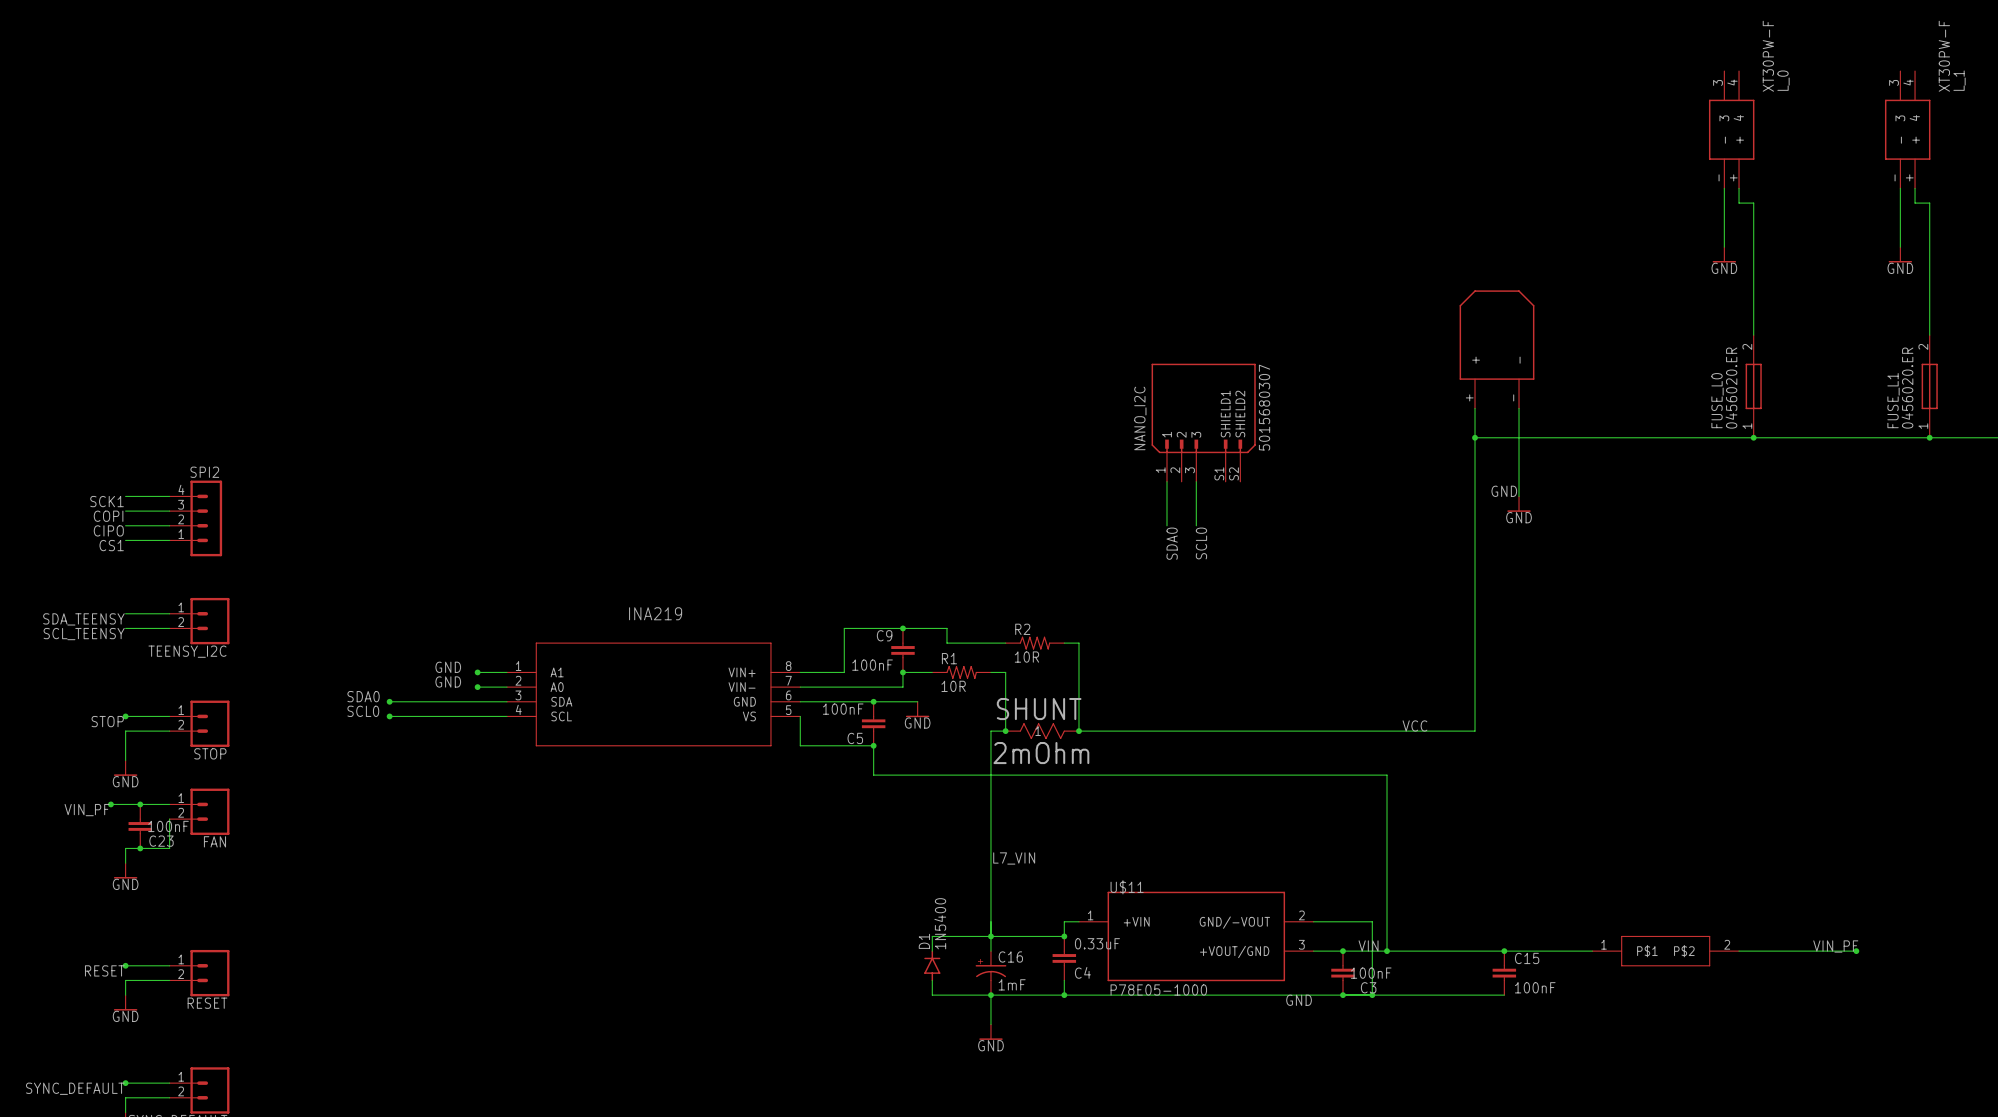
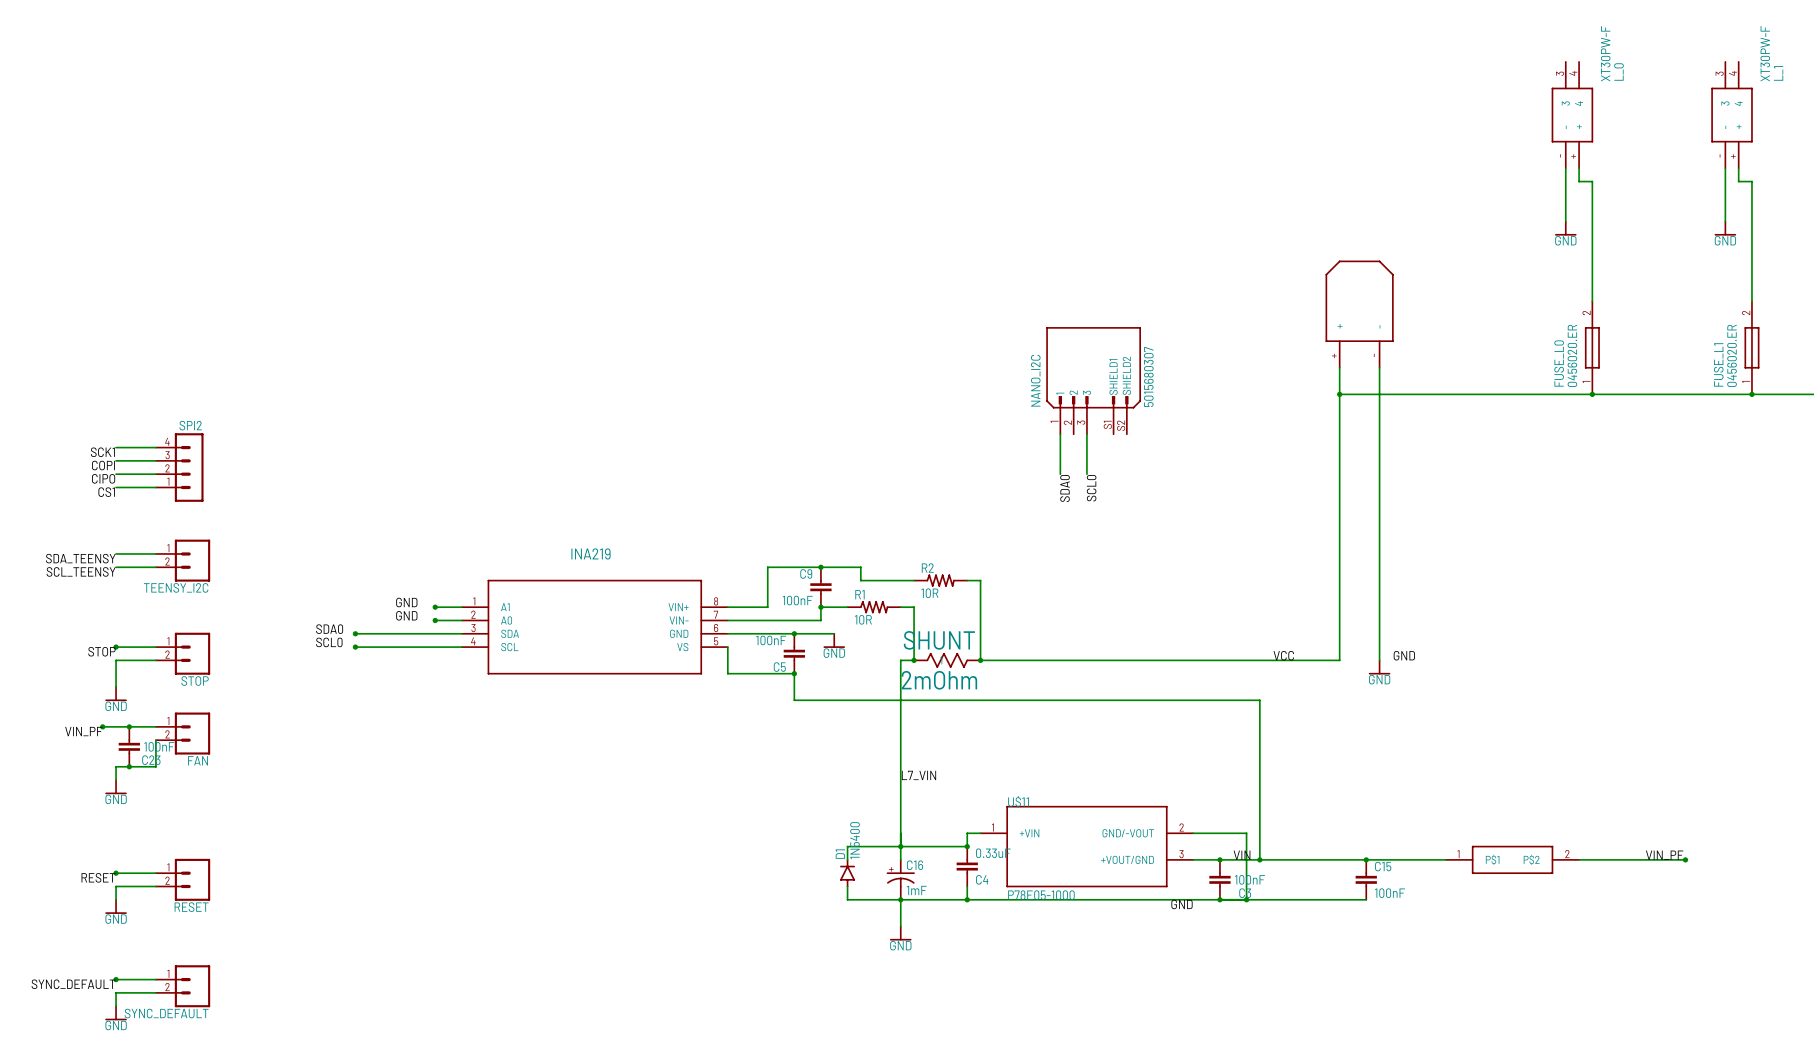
label: GND (1504, 491) -> none
wire: none -> (1379, 447) (1379, 660)
power symbol: GND (1519, 504) -> none
label: none -> GND (1404, 655)
power symbol: none -> GND (1379, 667)

